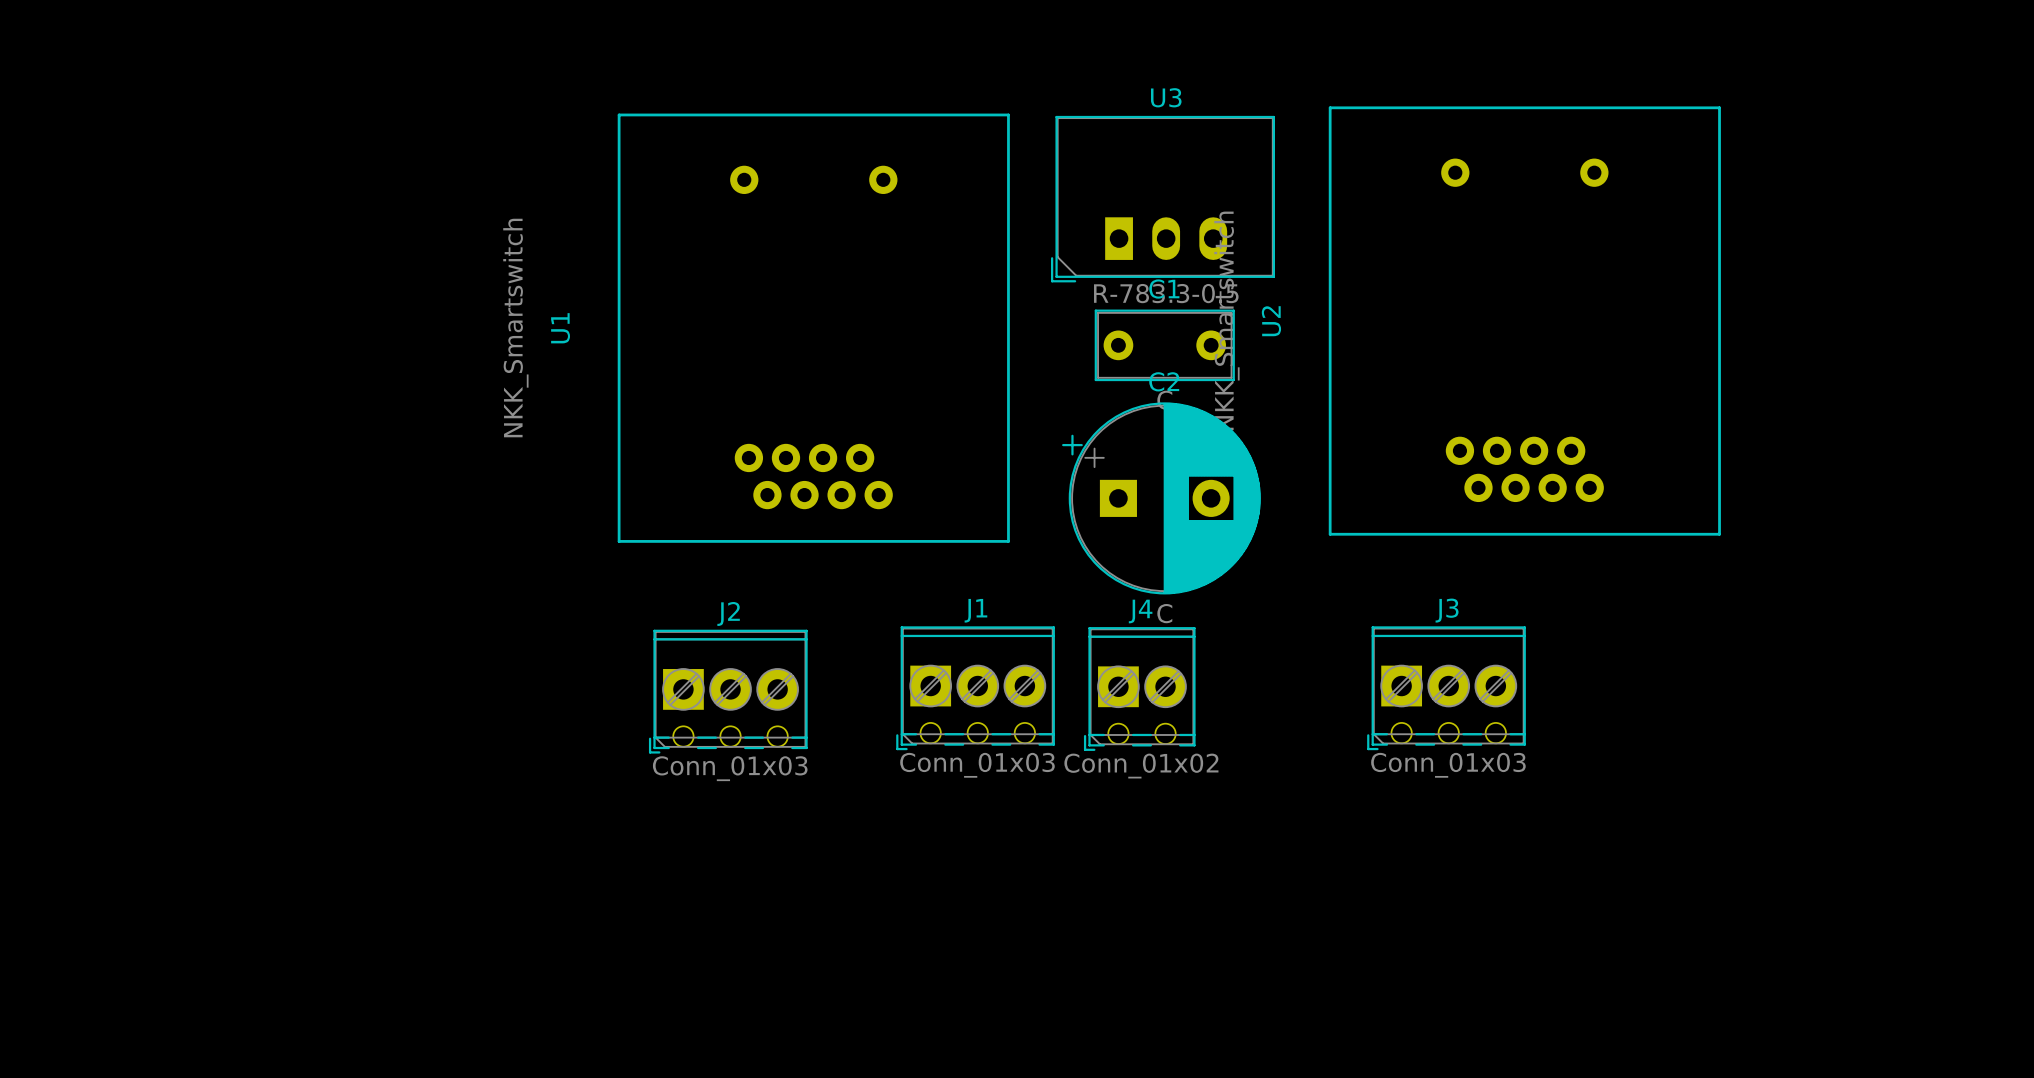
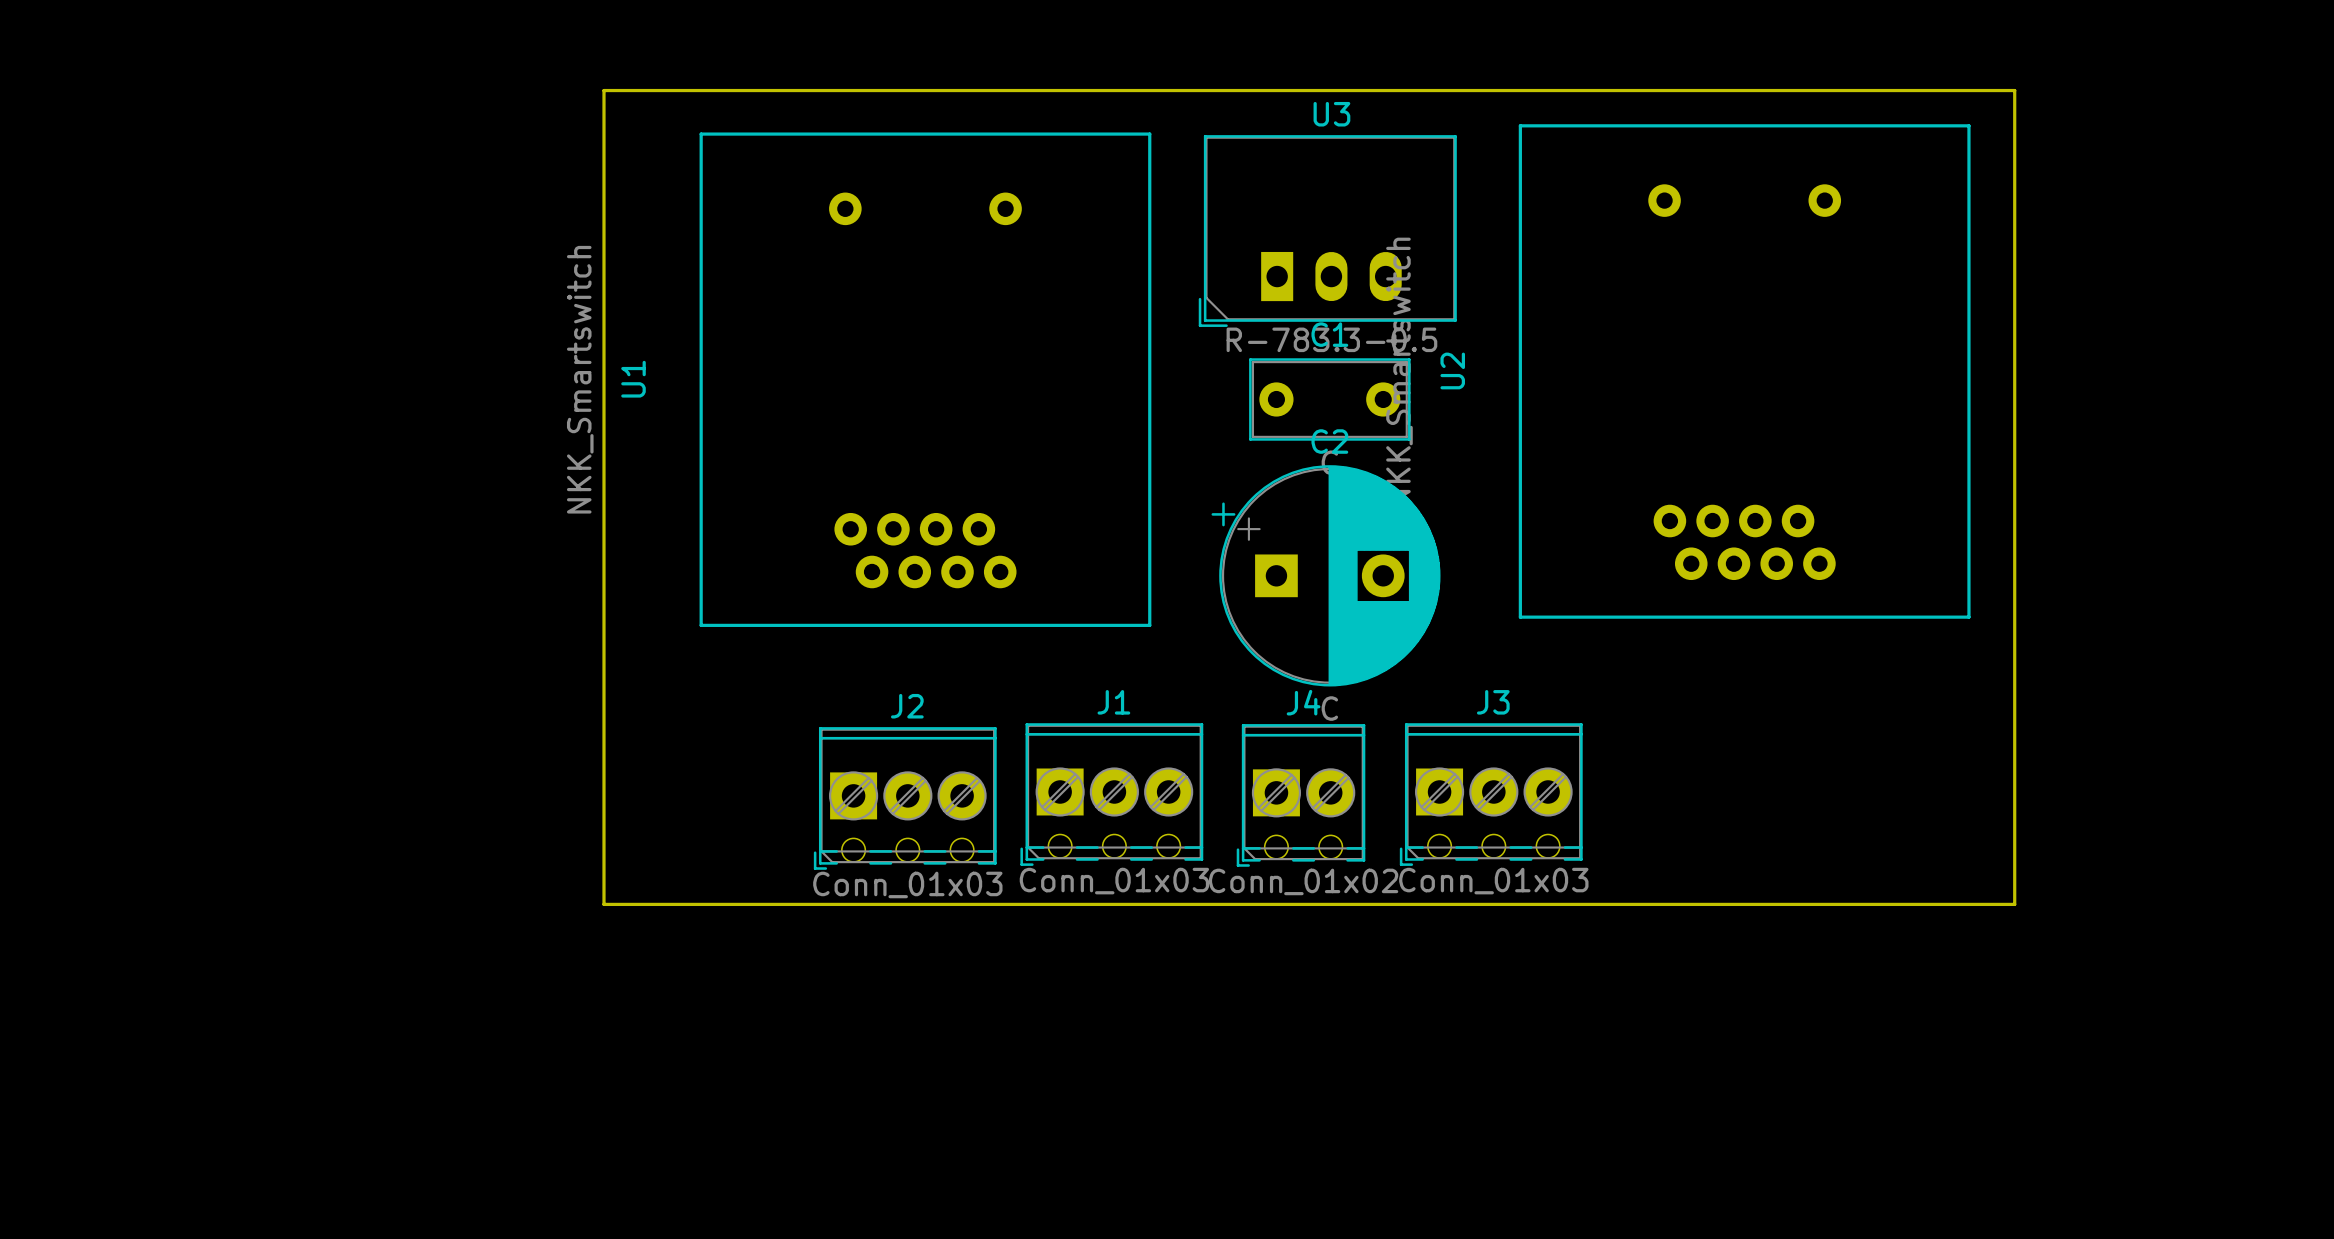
board edge: none -> (603, 90) (603, 904) (2014, 904) (2014, 90) (603, 90)
J3 position: (1446, 688) -> (1491, 794)
J2 position: (728, 691) -> (905, 798)

